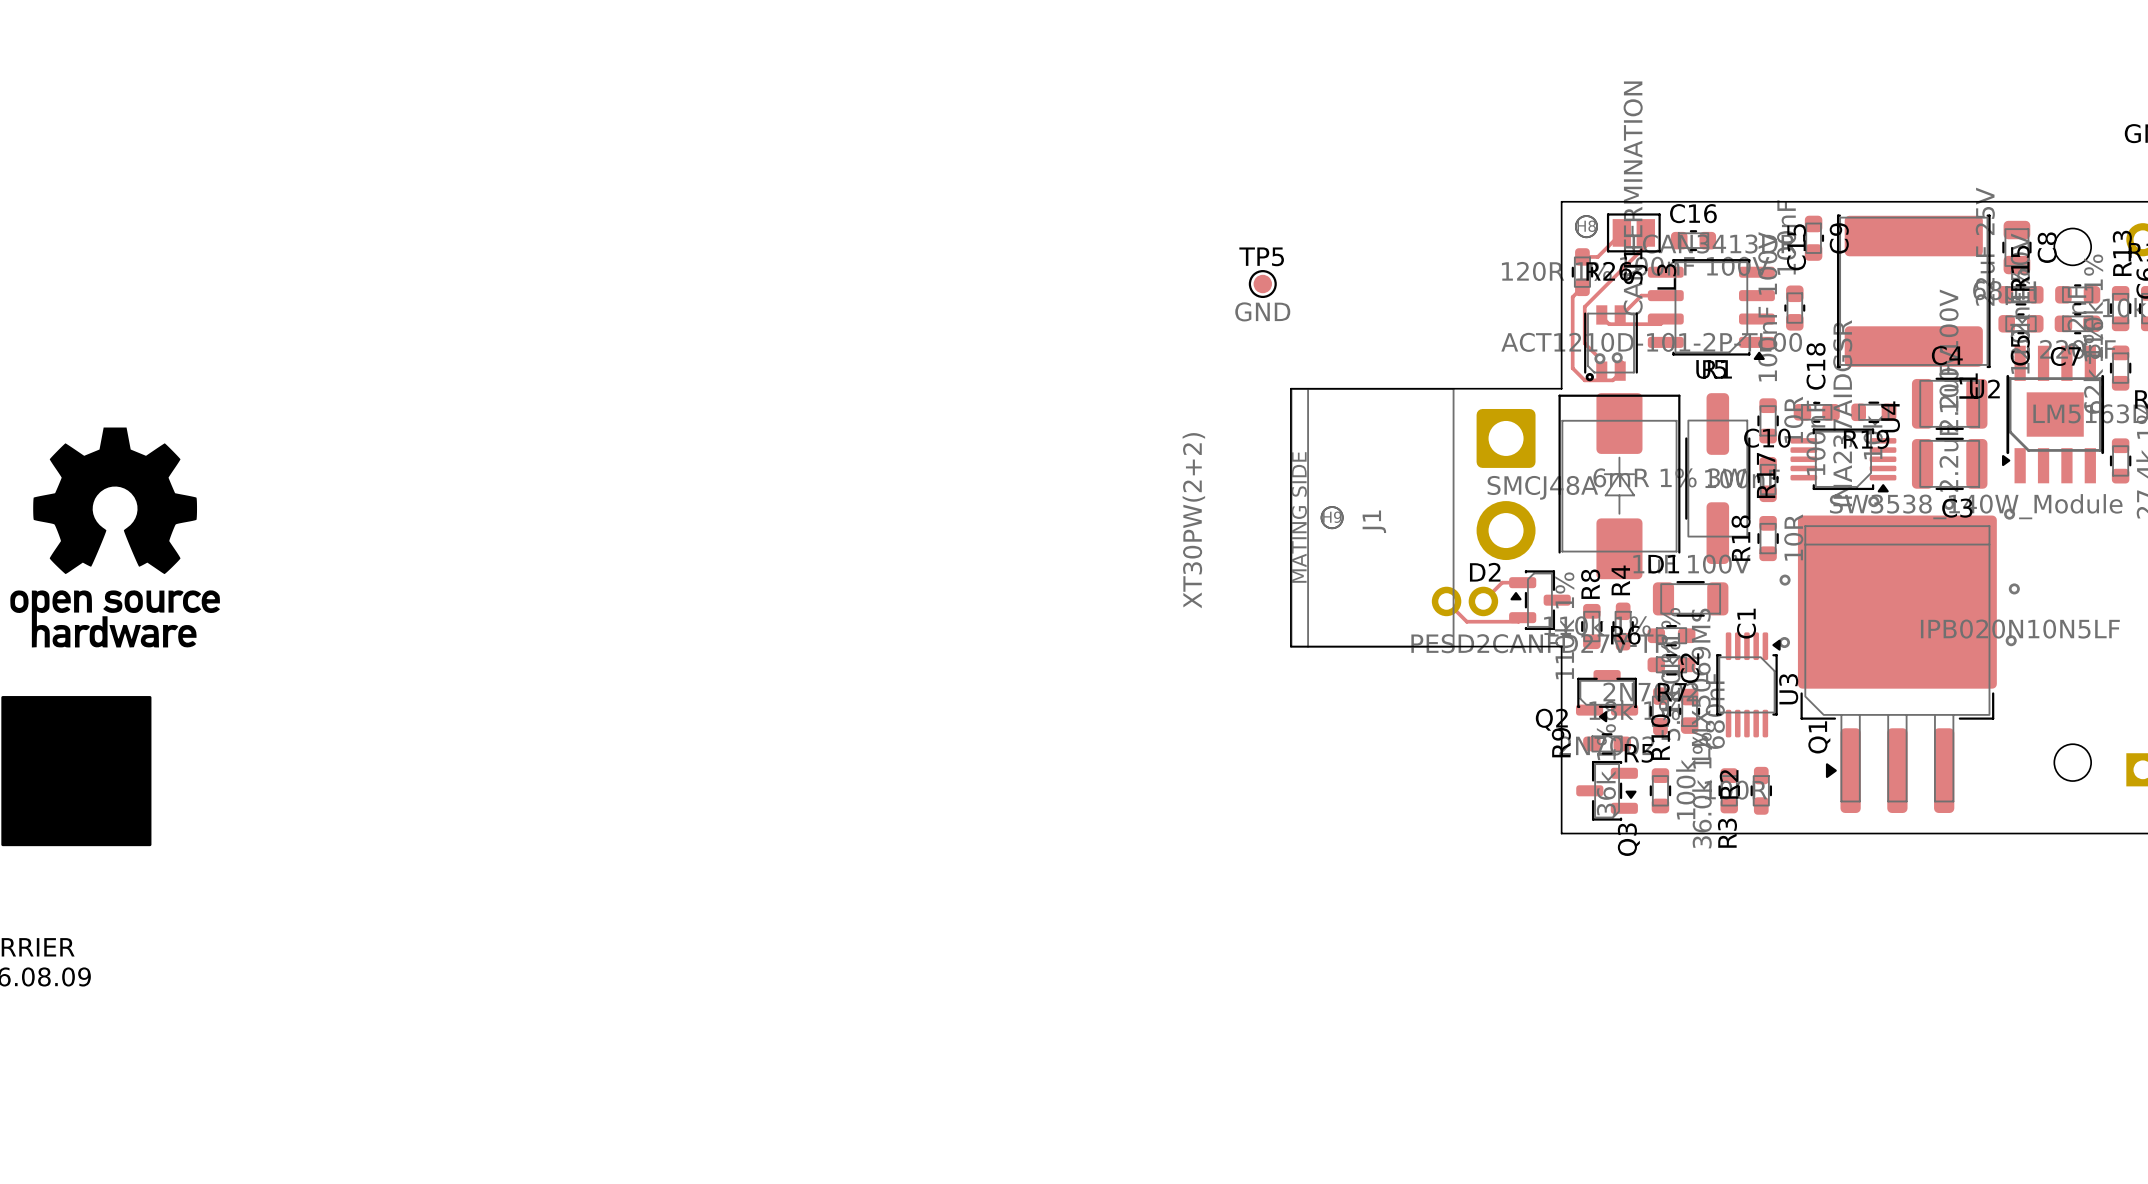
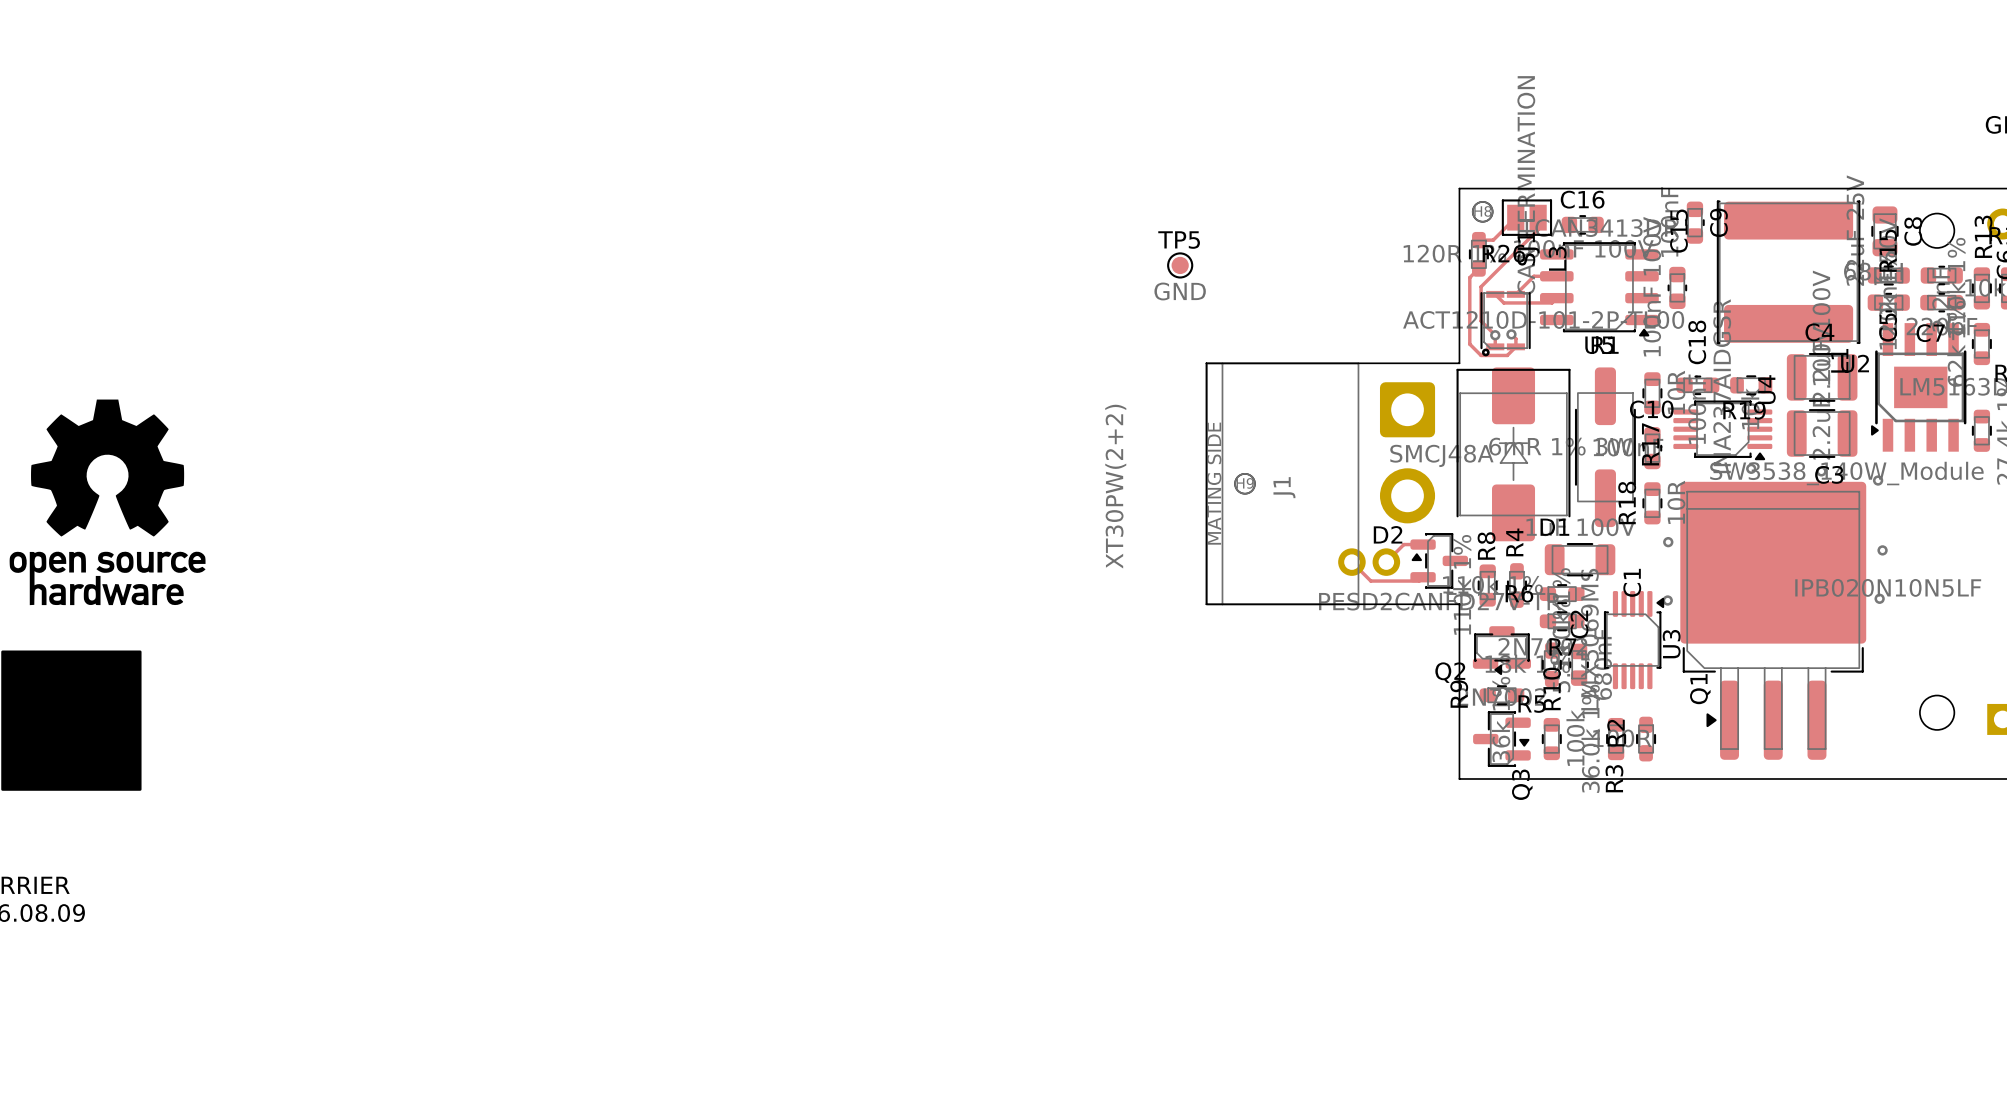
L3 footprint: [1584, 305, 1638, 382] -> [1480, 290, 1531, 357]

